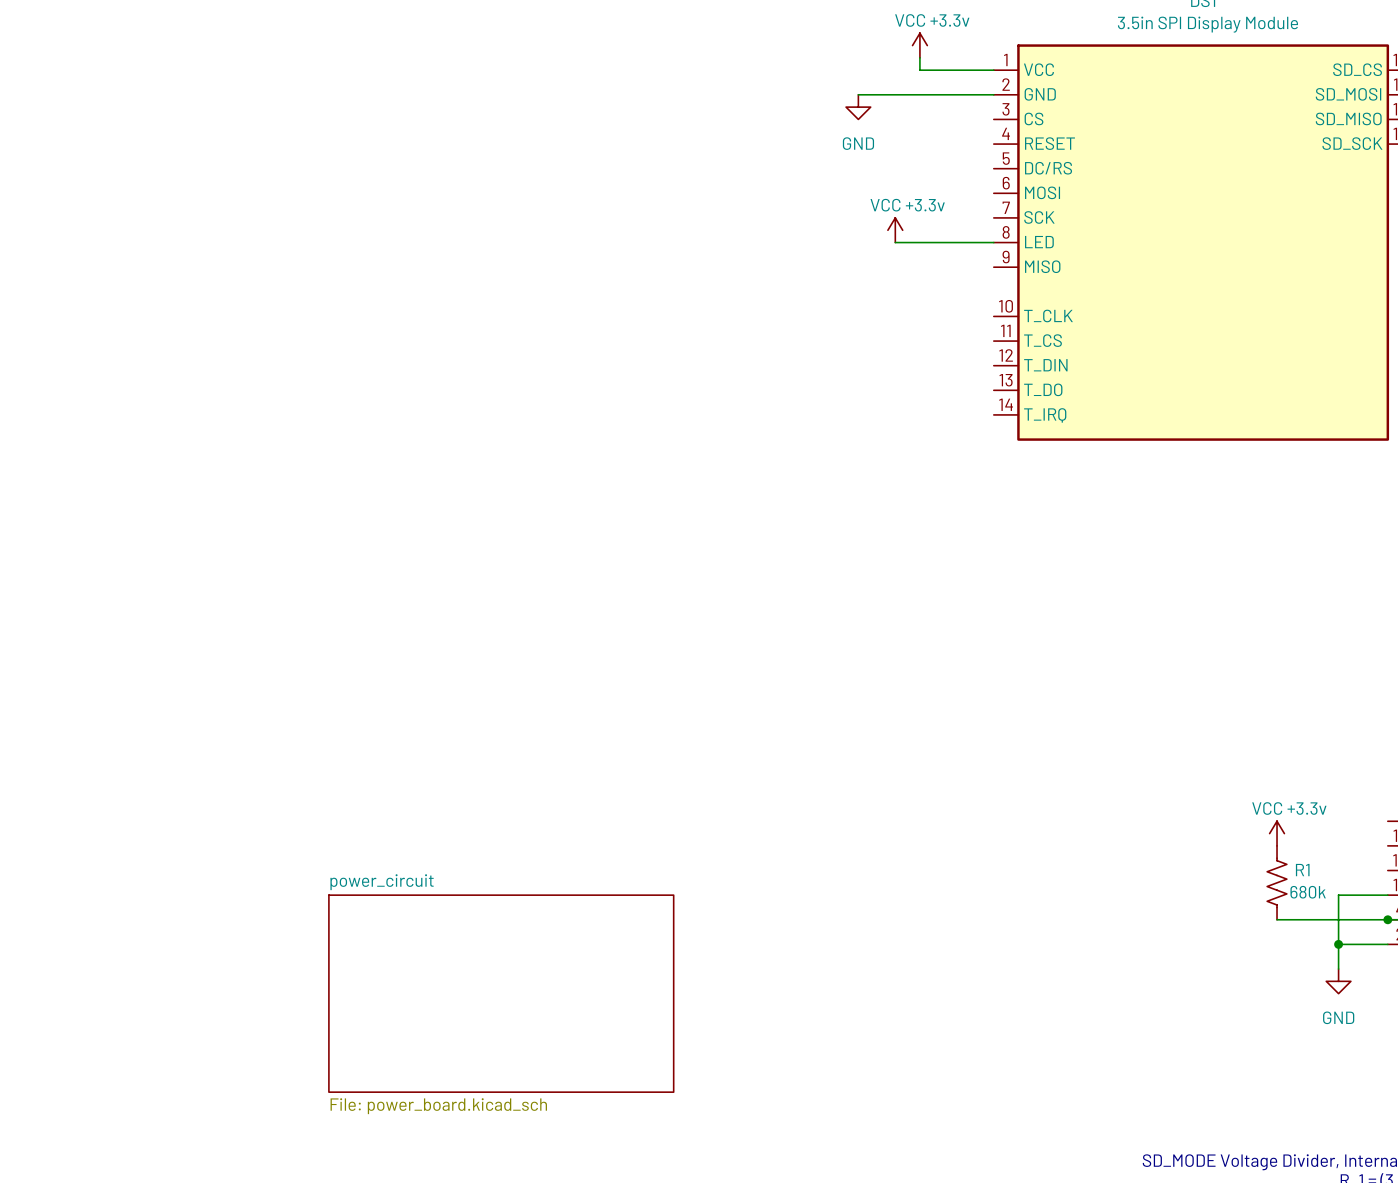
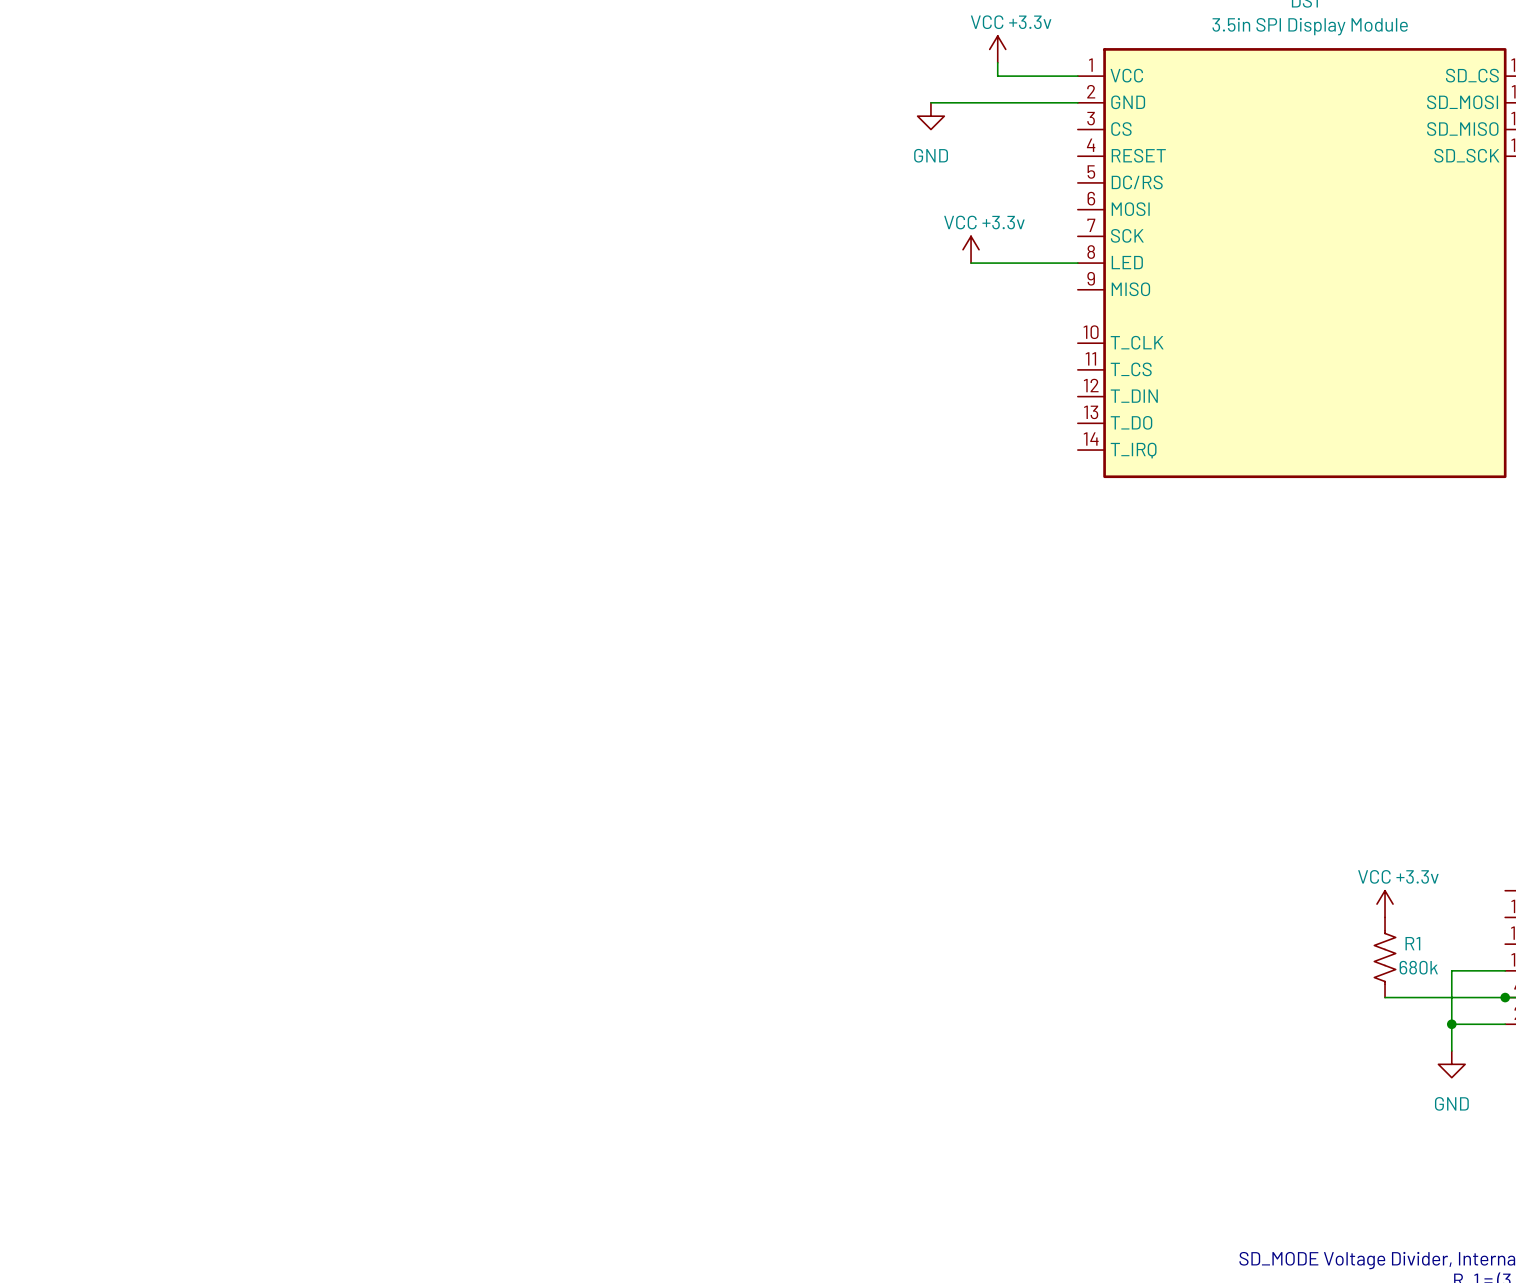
sheet power_circuit: File: power_board.kicad_sch (501, 993) -> none

